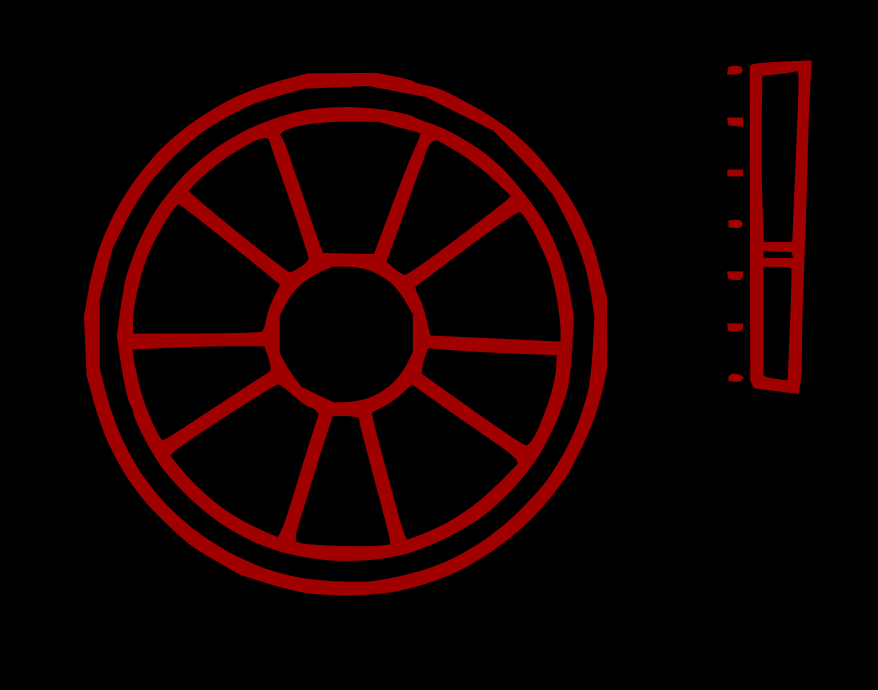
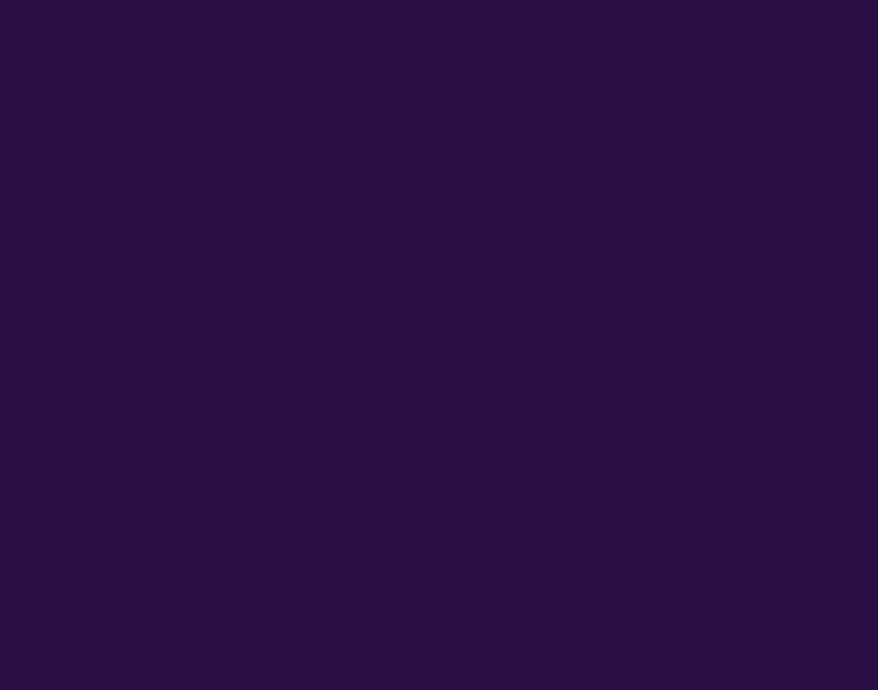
drawing: [726, 60, 812, 395] -> none
drawing: [83, 72, 608, 596] -> none

